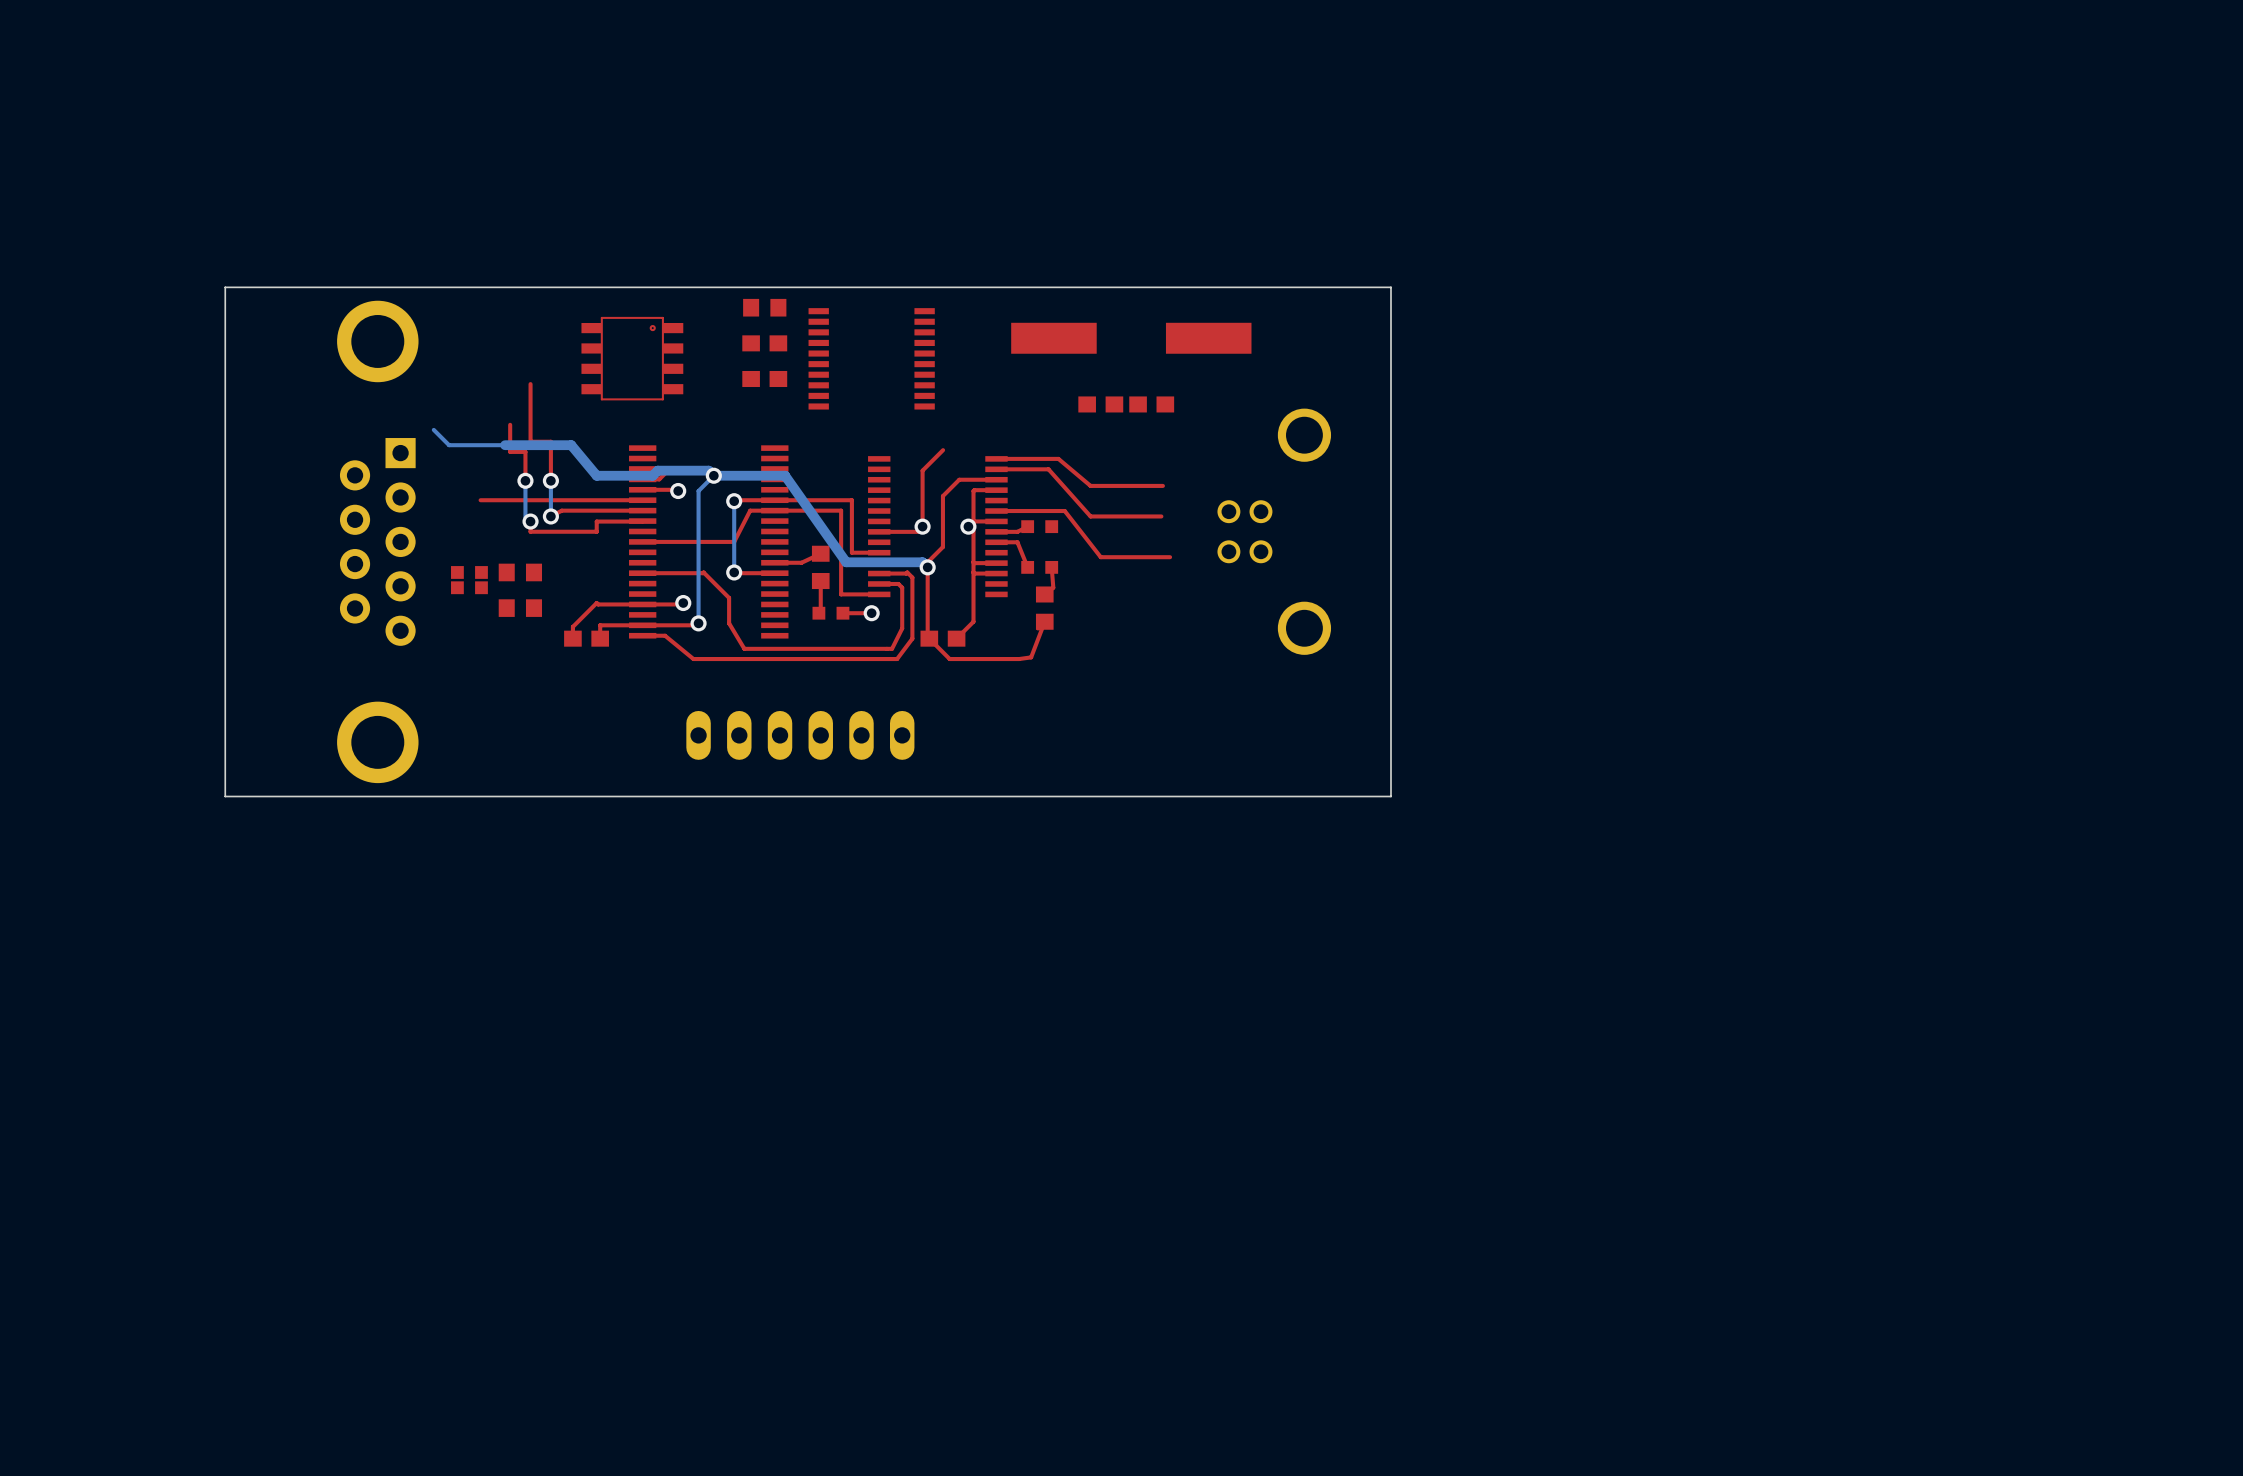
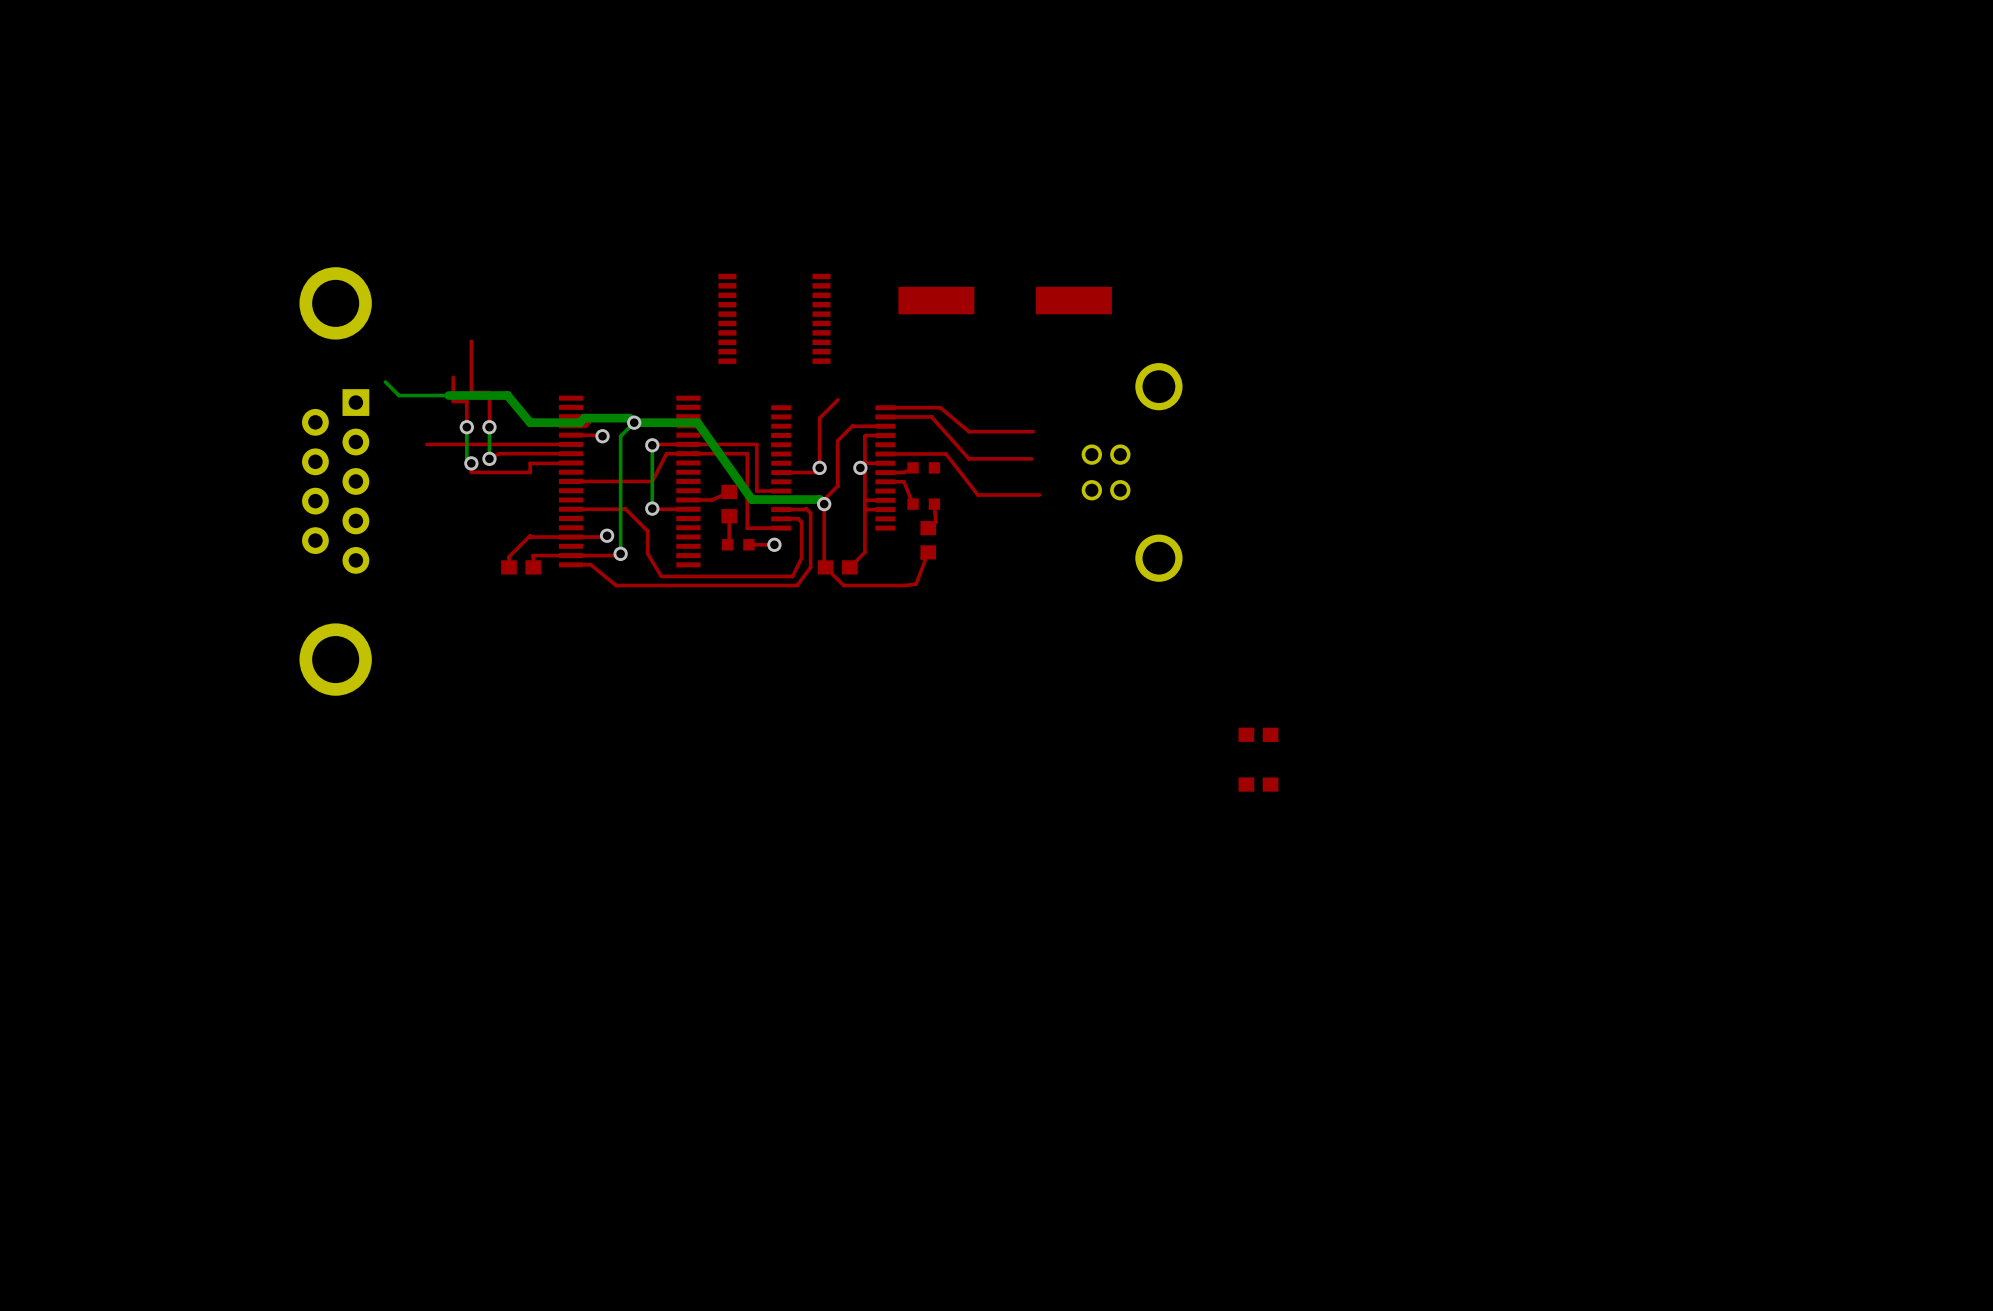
board edge: (1391, 287) (225, 287) (225, 796) (1391, 796) (1391, 287) -> none
part: (764, 307) -> none
part: (764, 343) -> none
part: (632, 358) -> none
part: (764, 379) -> none
part: (1100, 404) -> none
part: (1151, 404) -> none
part: (469, 572) -> none
part: (520, 572) -> none
part: (469, 587) -> none
part: (520, 608) -> none
part: (800, 735) -> none
part: none -> (1258, 734)
part: none -> (1258, 784)

